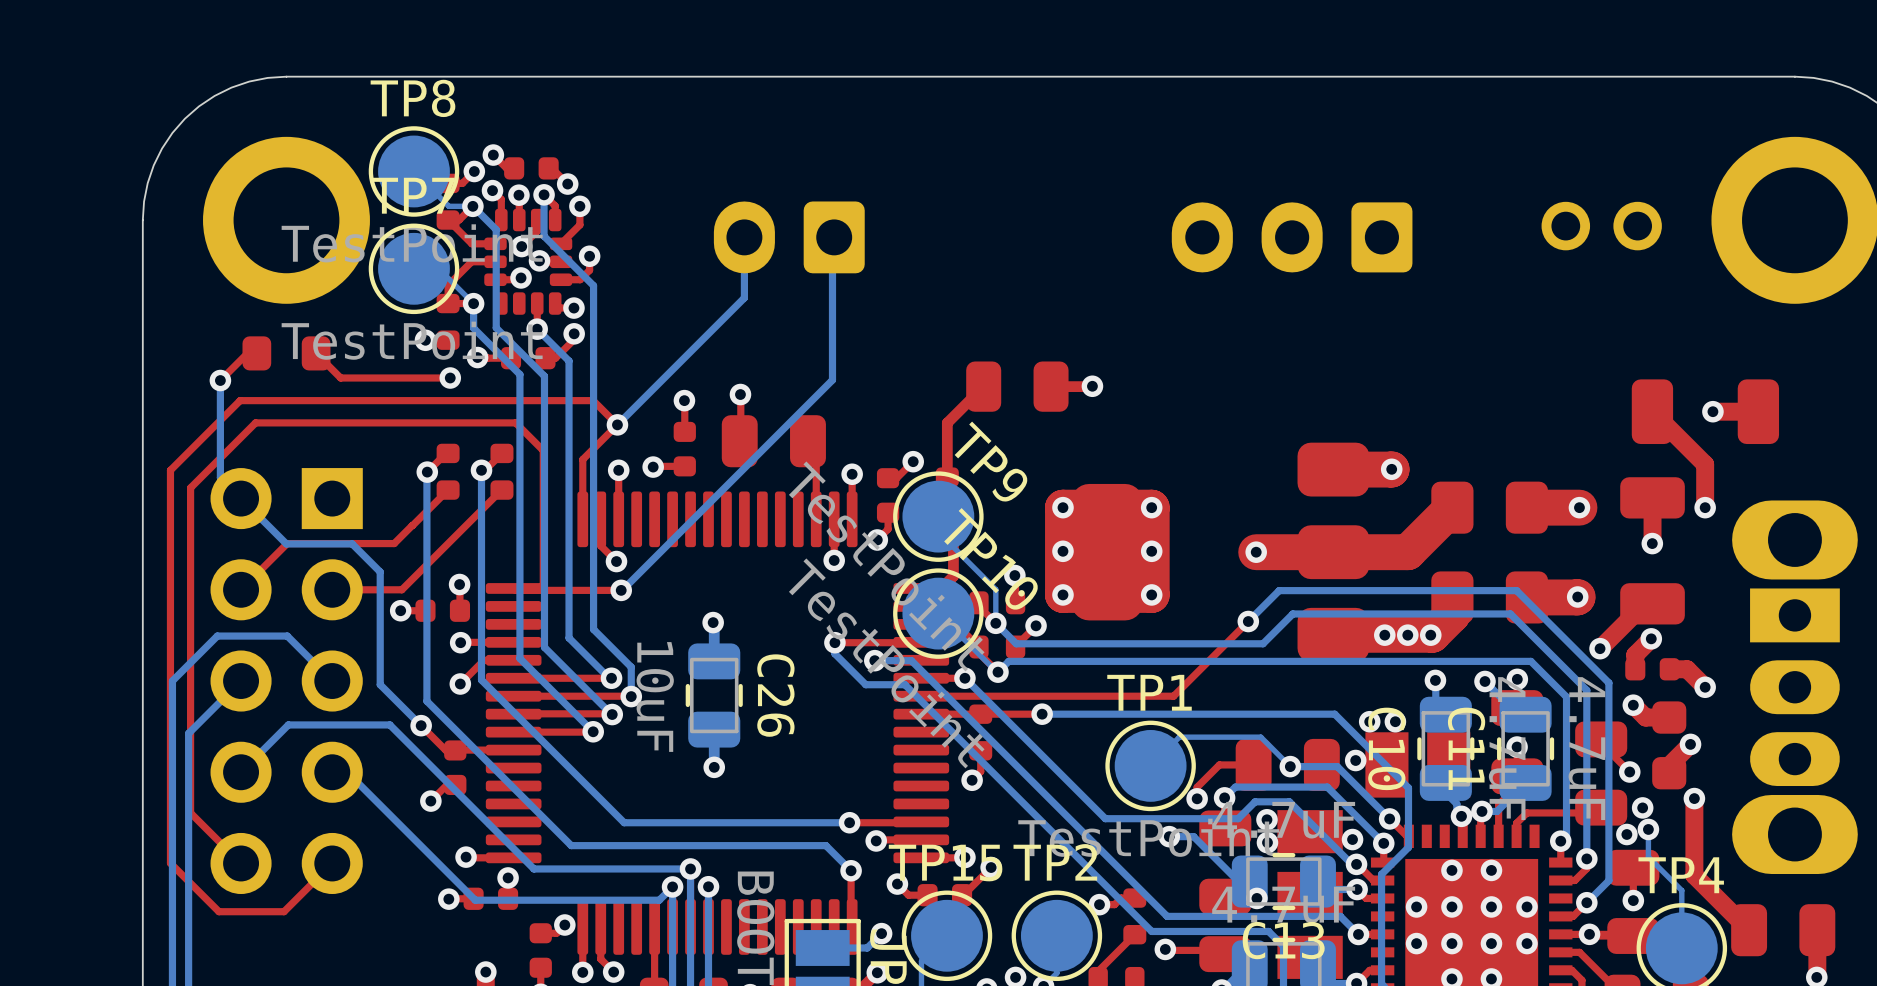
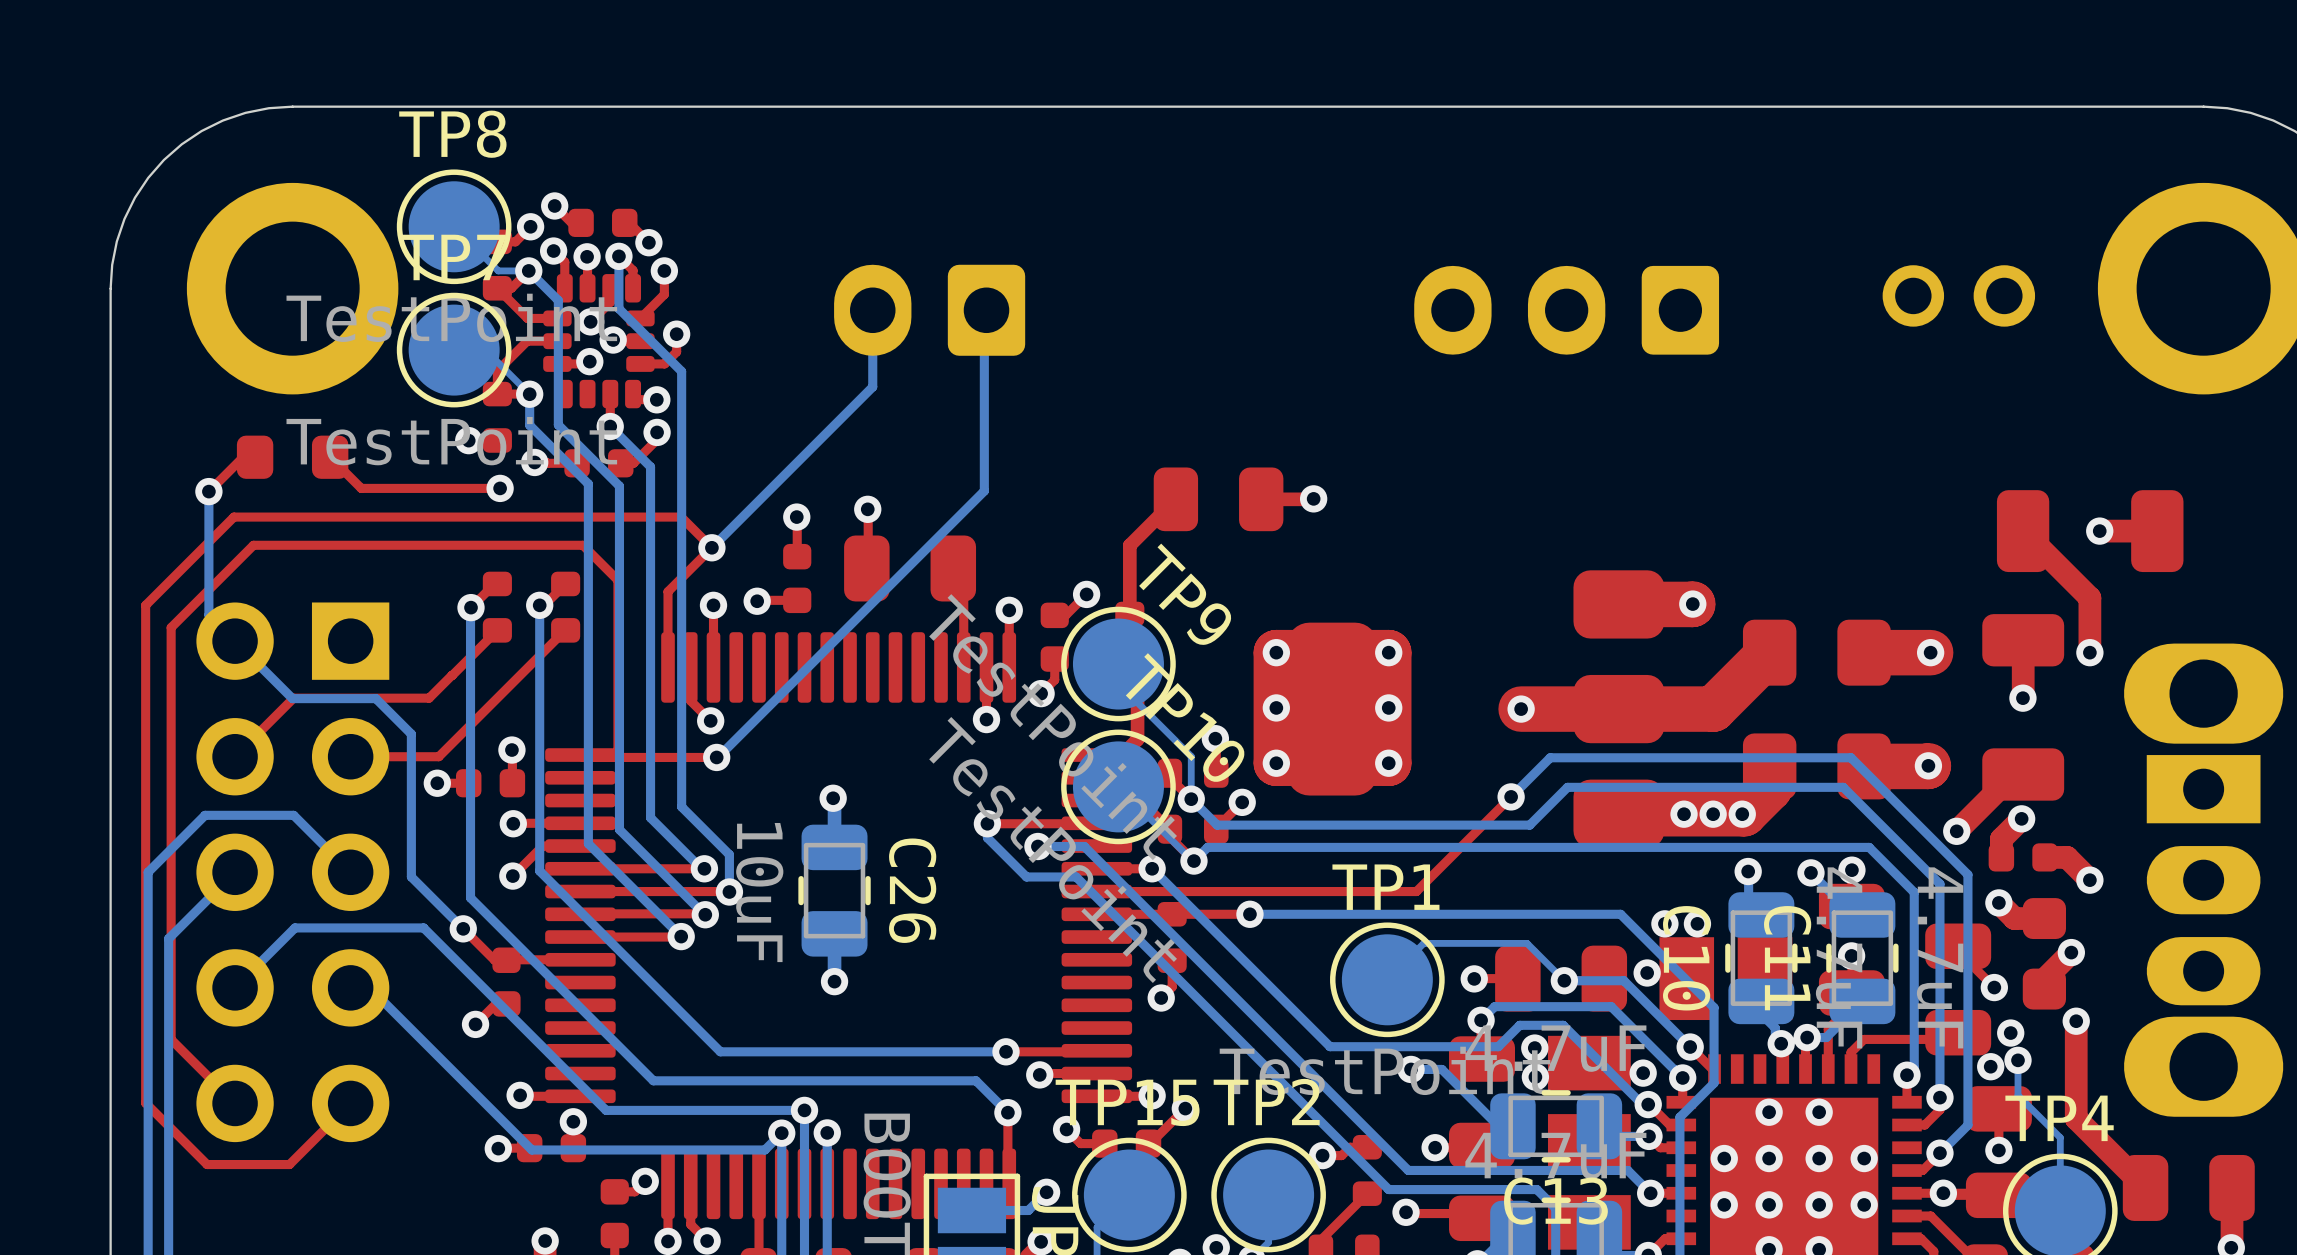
top track: (1219, 765) (1197, 787) (1197, 798) -> none
via position: (1197, 798) -> (1474, 978)
via: none -> (1435, 1147)
via: (1256, 898) -> none

